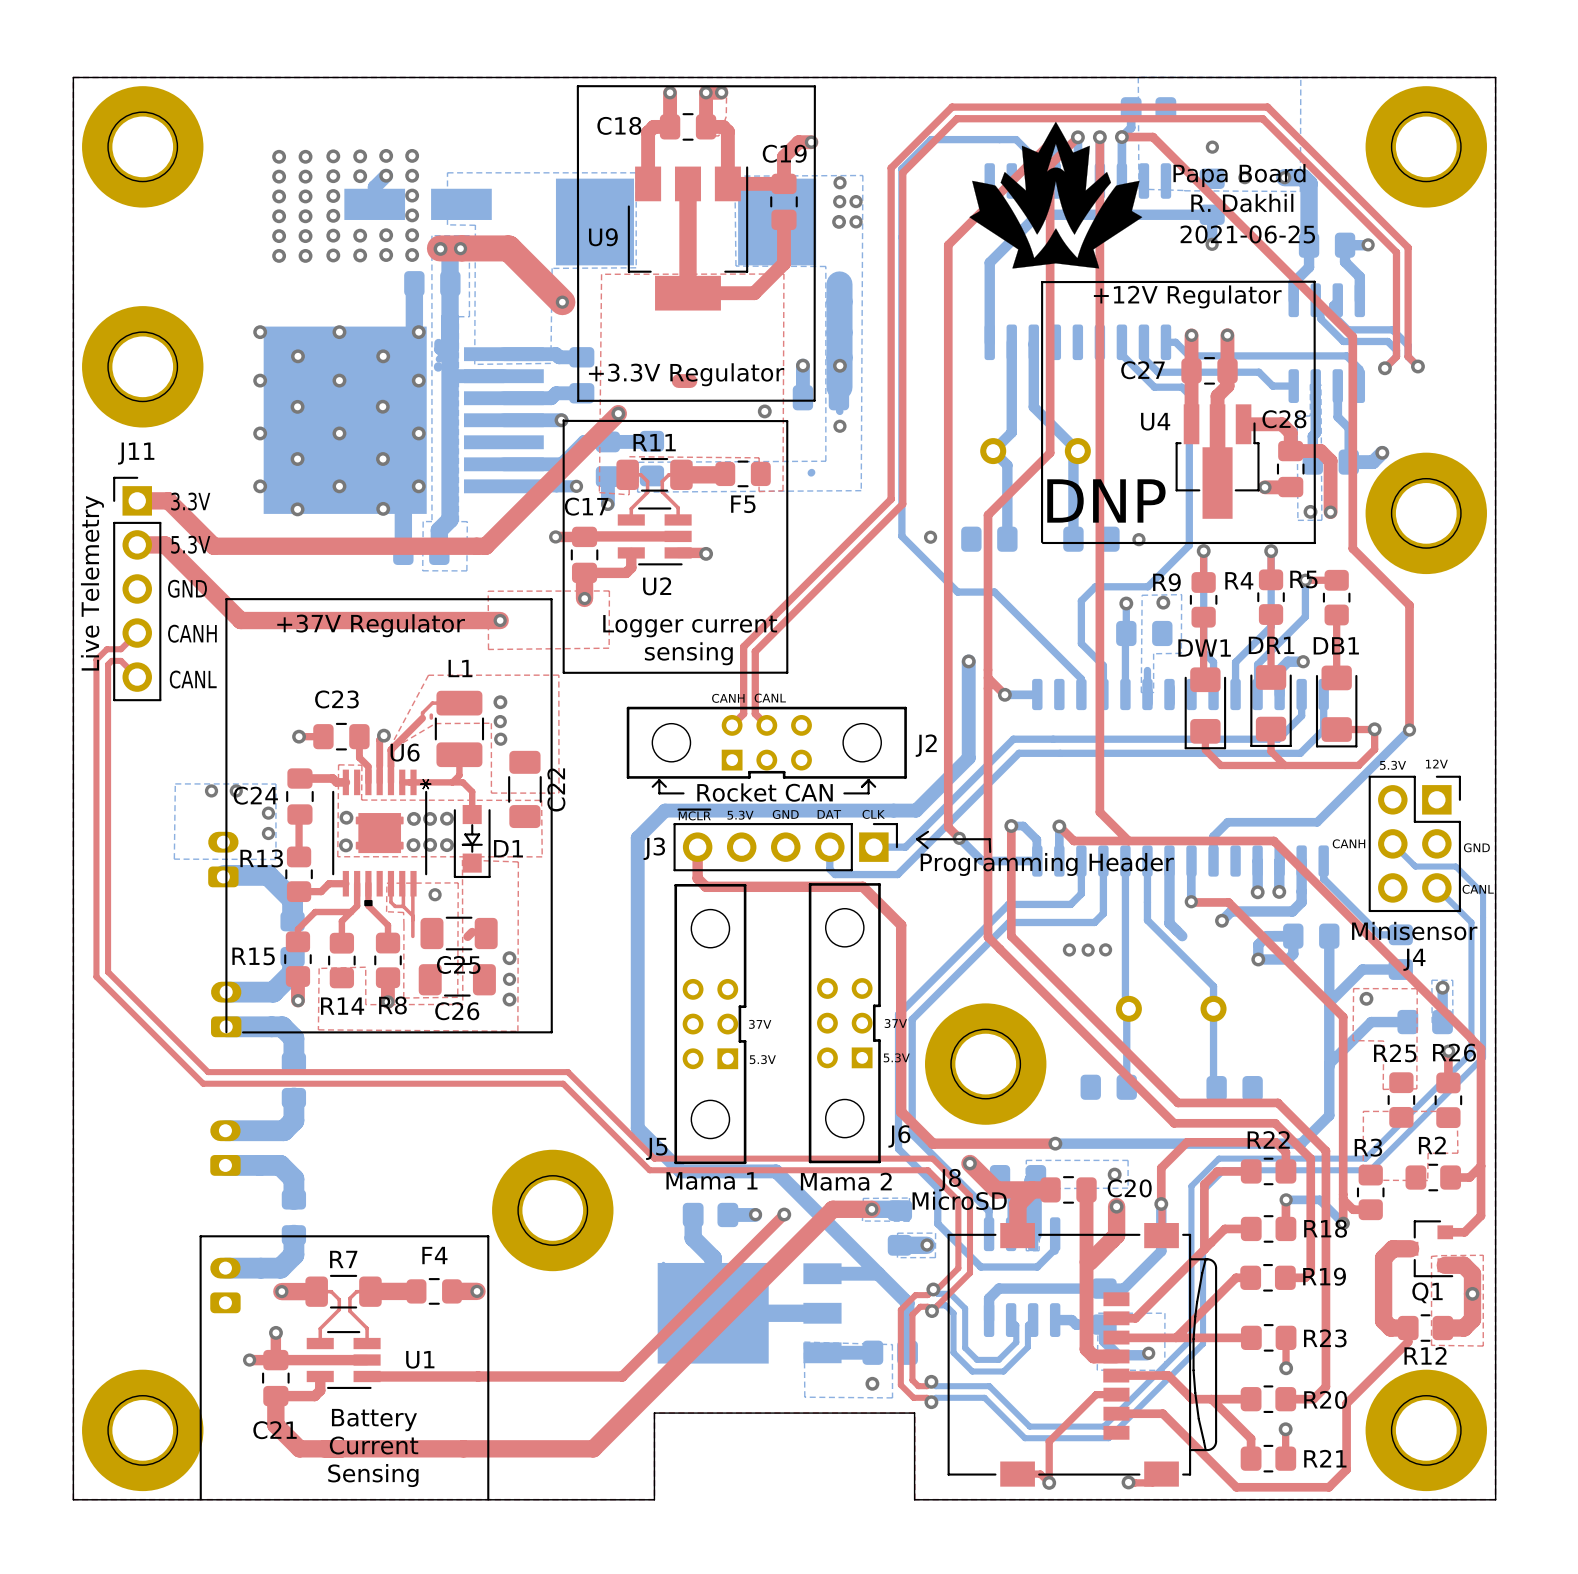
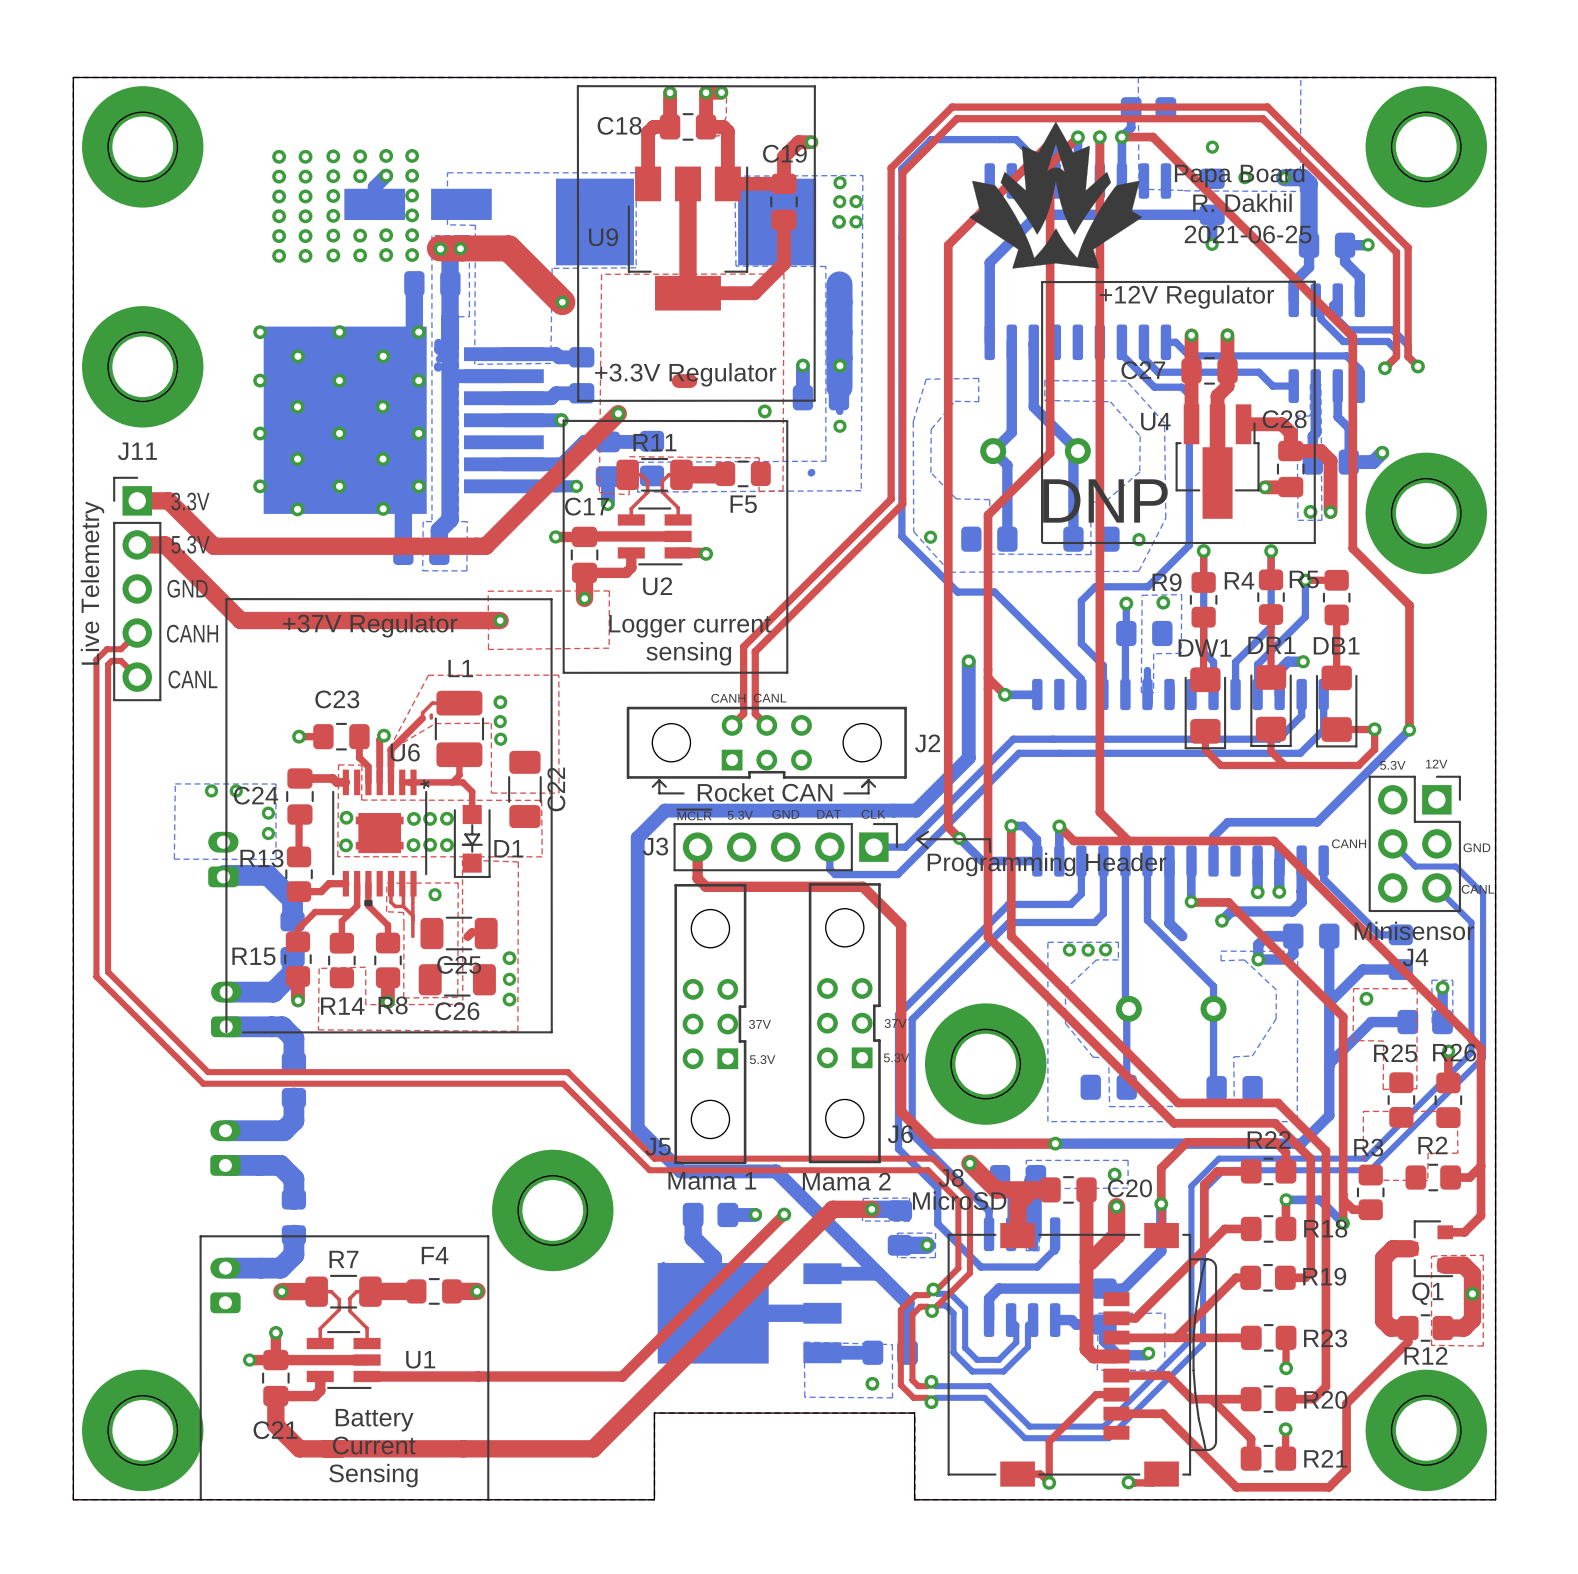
bottom zone outline: none -> (978, 378) (978, 401) (954, 401) (931, 429) (930, 472) (956, 498) (989, 499) (989, 554) (1091, 554) (1090, 502) (1105, 501) (1139, 472) (1140, 436) (1110, 401) (1044, 400) (1044, 380) (1126, 380) (1164, 422) (1165, 518) (1138, 571) (950, 572) (913, 531) (913, 421) (926, 379) (978, 378)
bottom zone outline: none -> (1047, 942) (1047, 1121) (1297, 1121) (1297, 951) (1221, 951) (1221, 960) (1244, 959) (1276, 989) (1276, 1018) (1252, 1055) (1233, 1056) (1234, 1106) (1109, 1106) (1108, 1057) (1093, 1057) (1065, 1023) (1065, 989) (1096, 959) (1118, 959) (1118, 942) (1047, 942)

